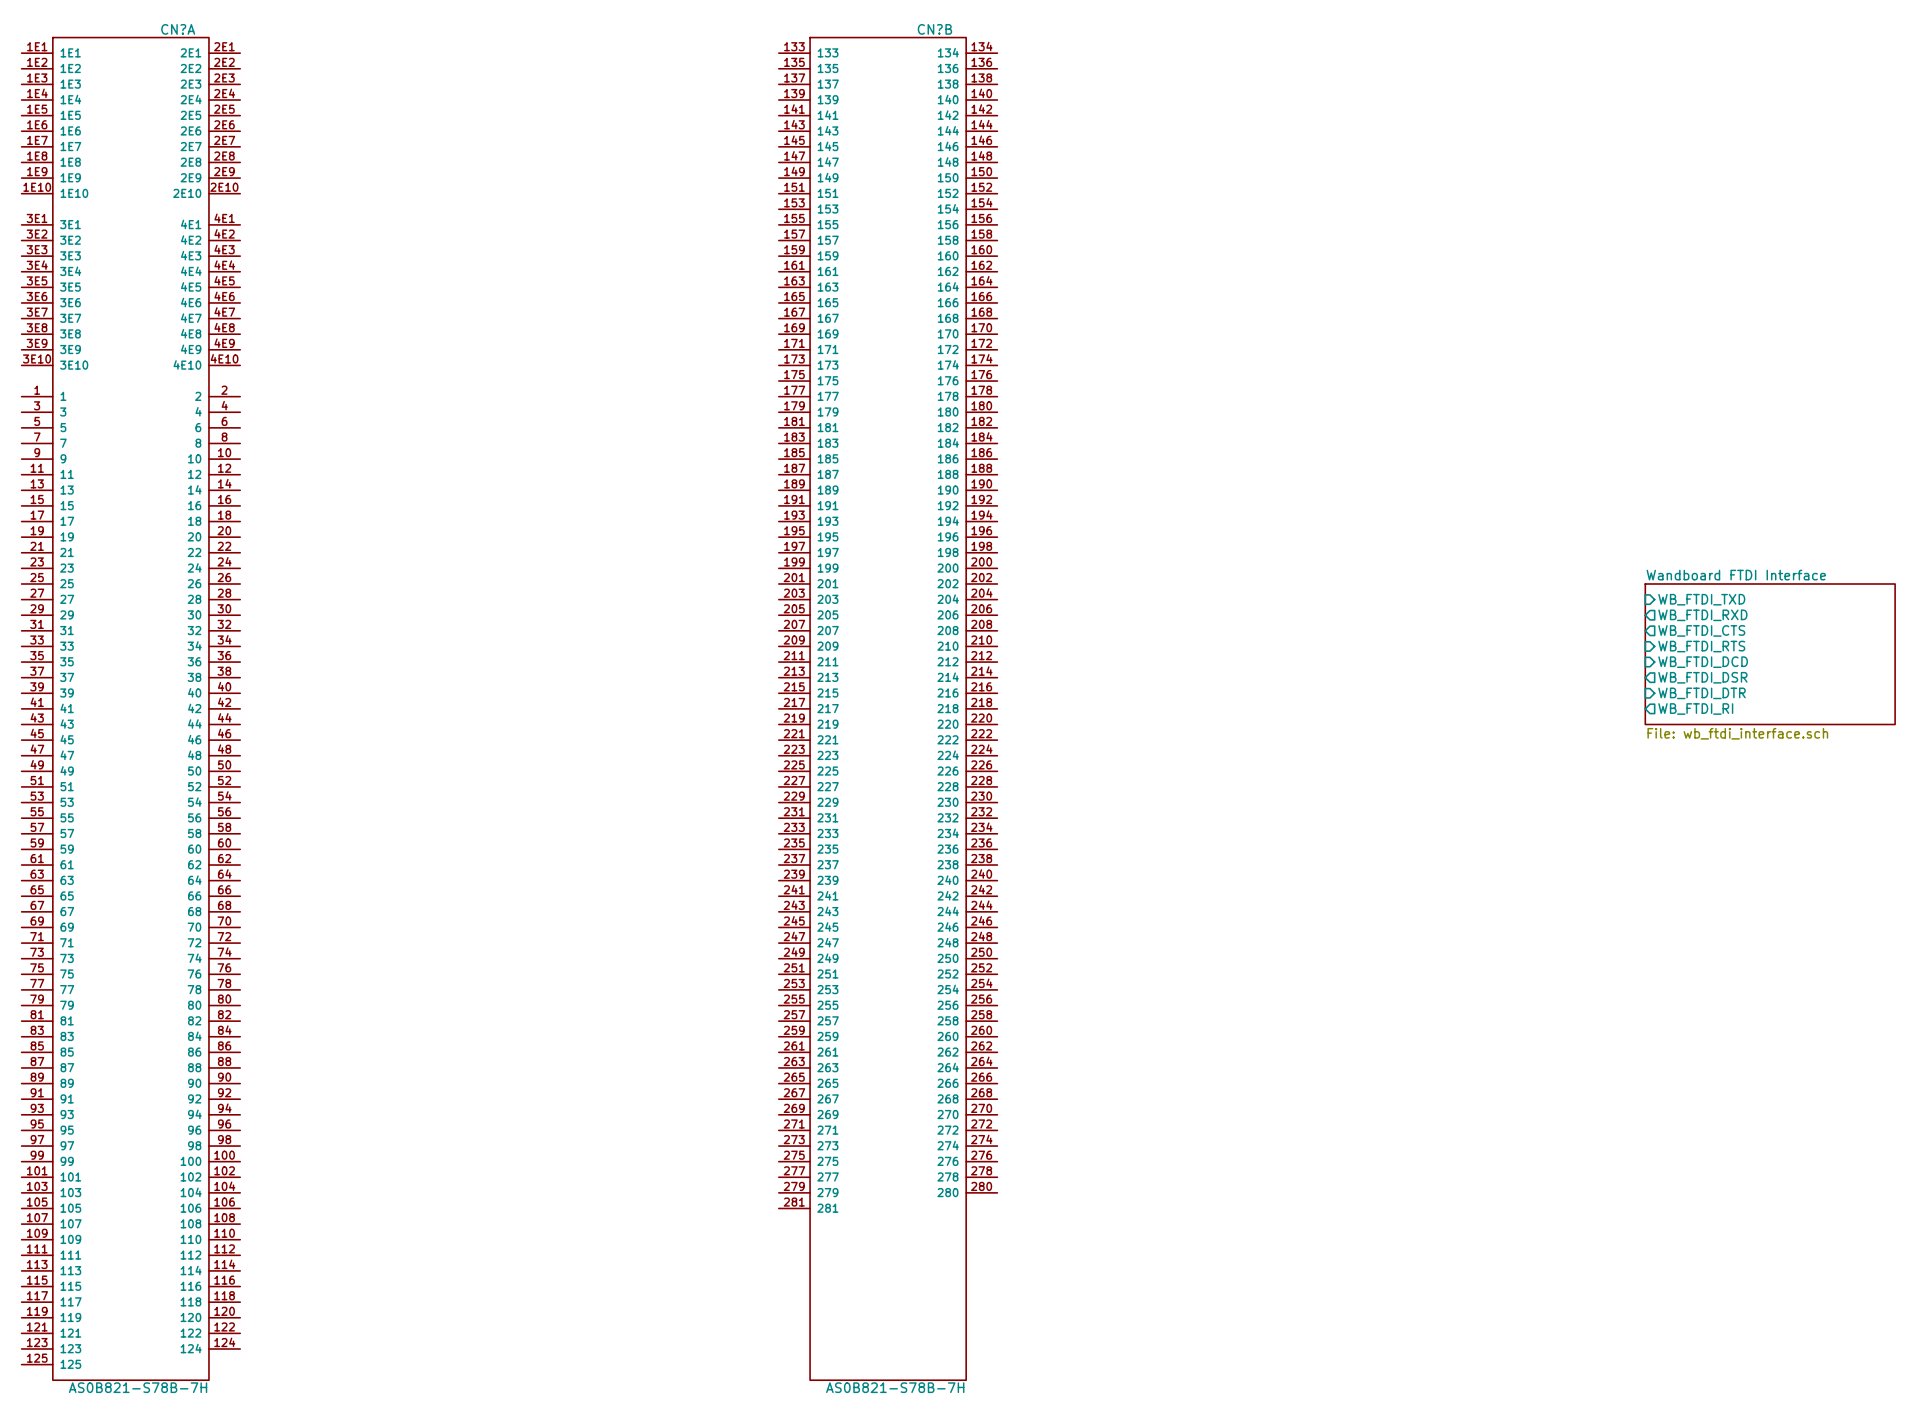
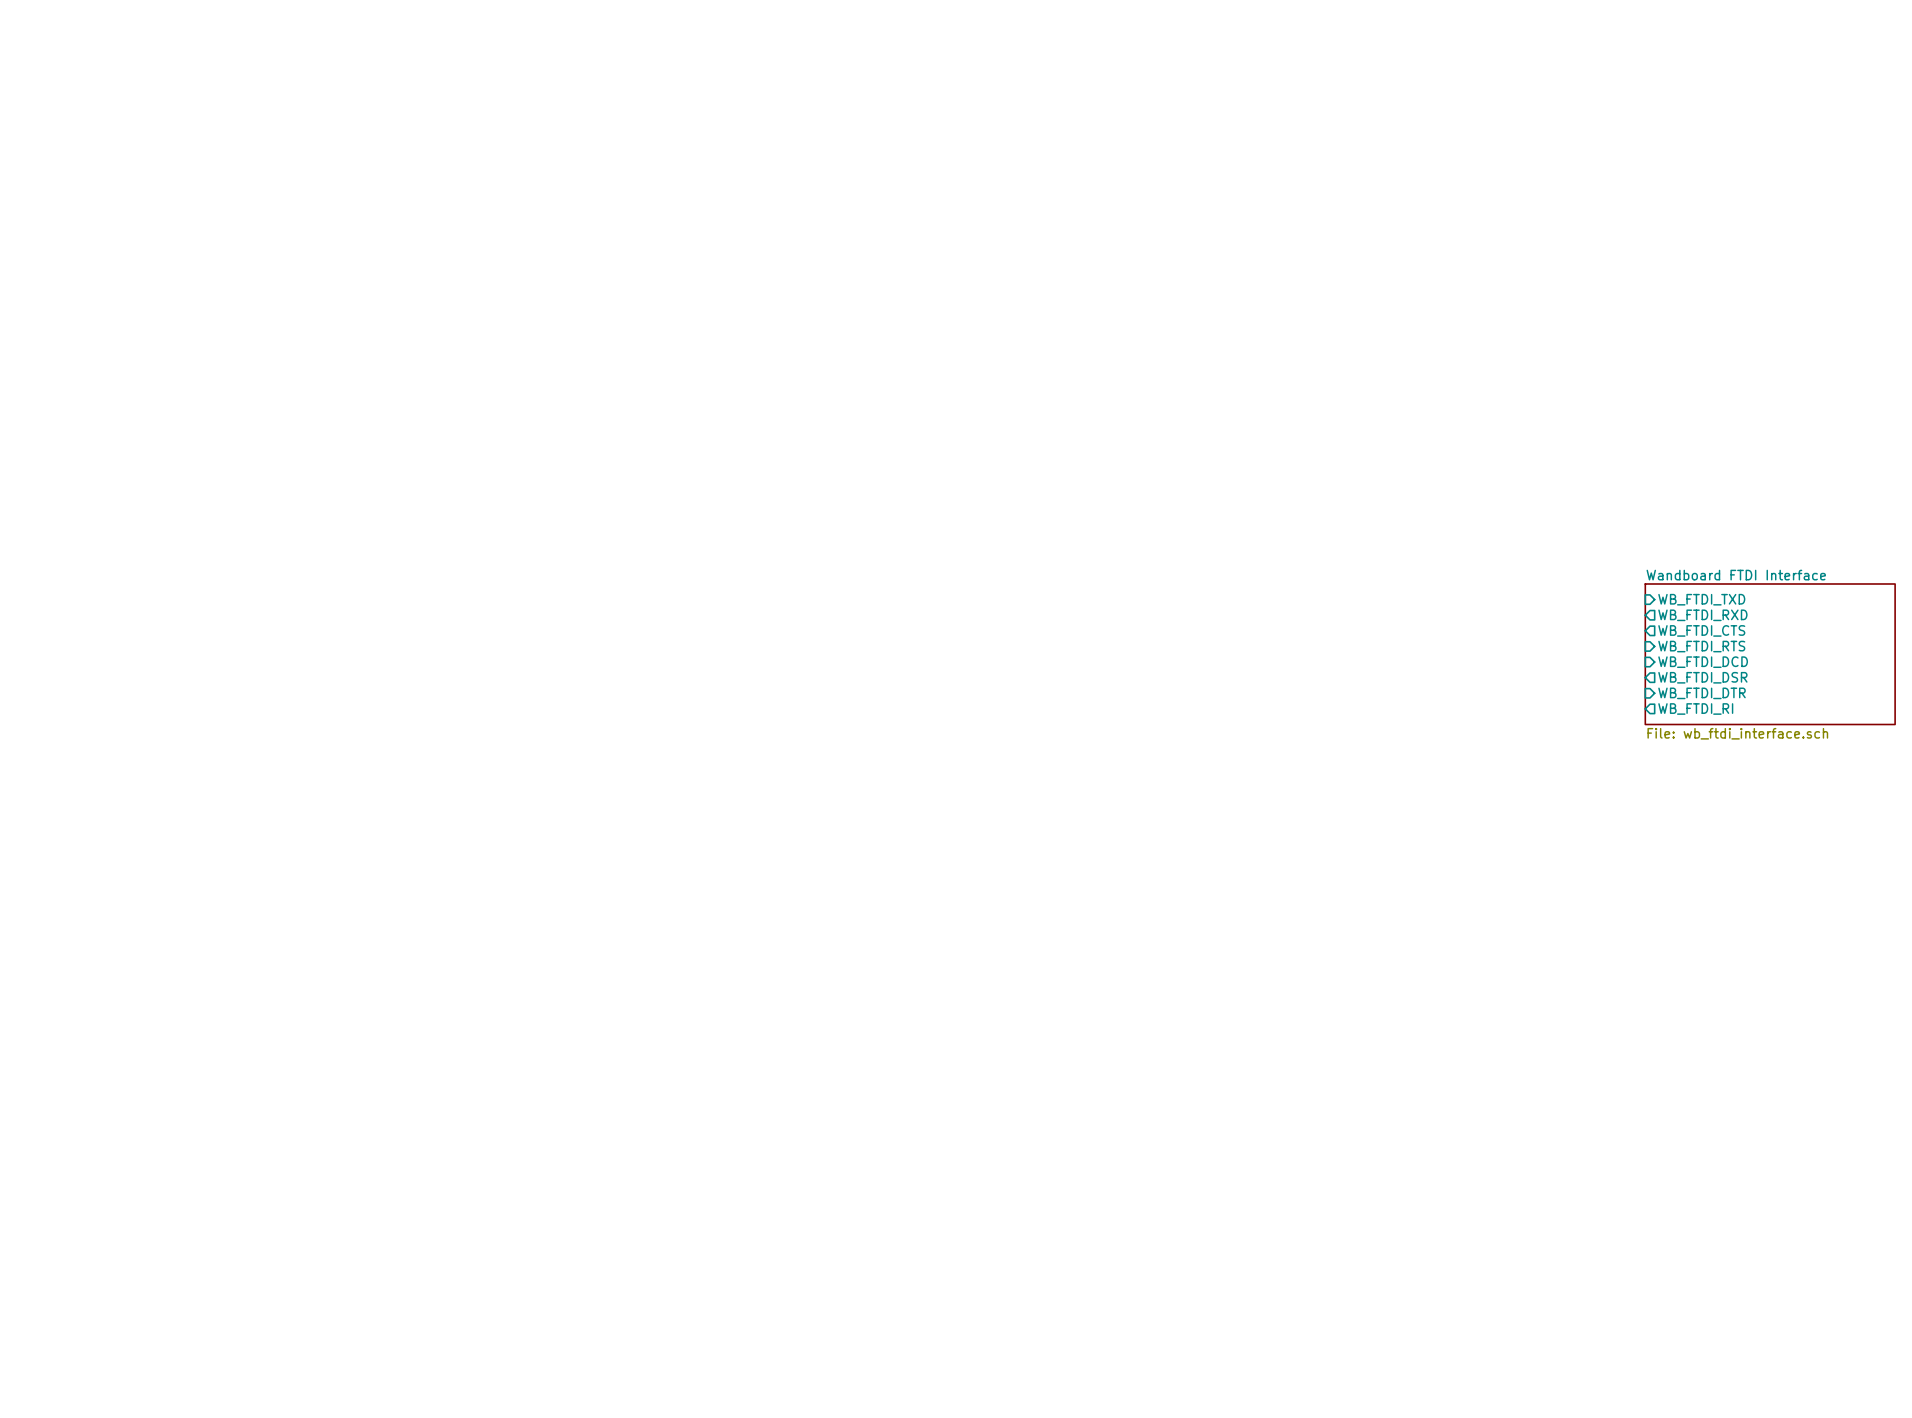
CN?A: AS0B821-S78B-7H (130, 708) -> none
CN?B: AS0B821-S78B-7H (888, 708) -> none

